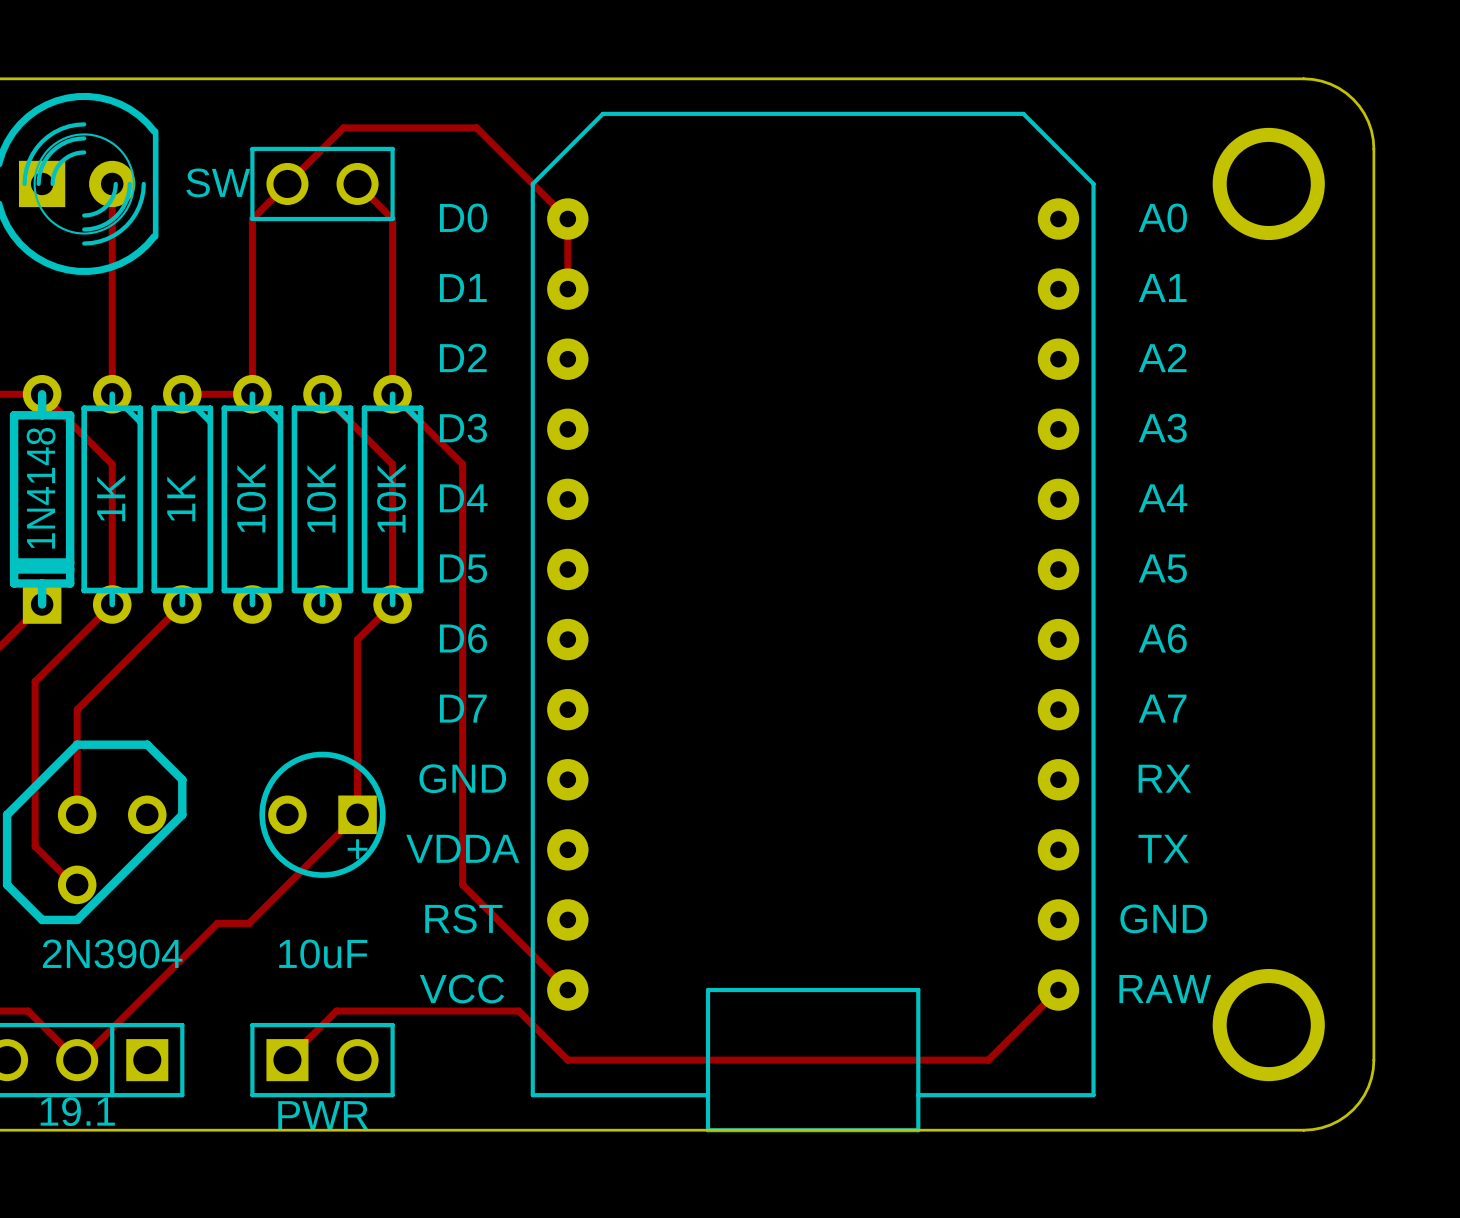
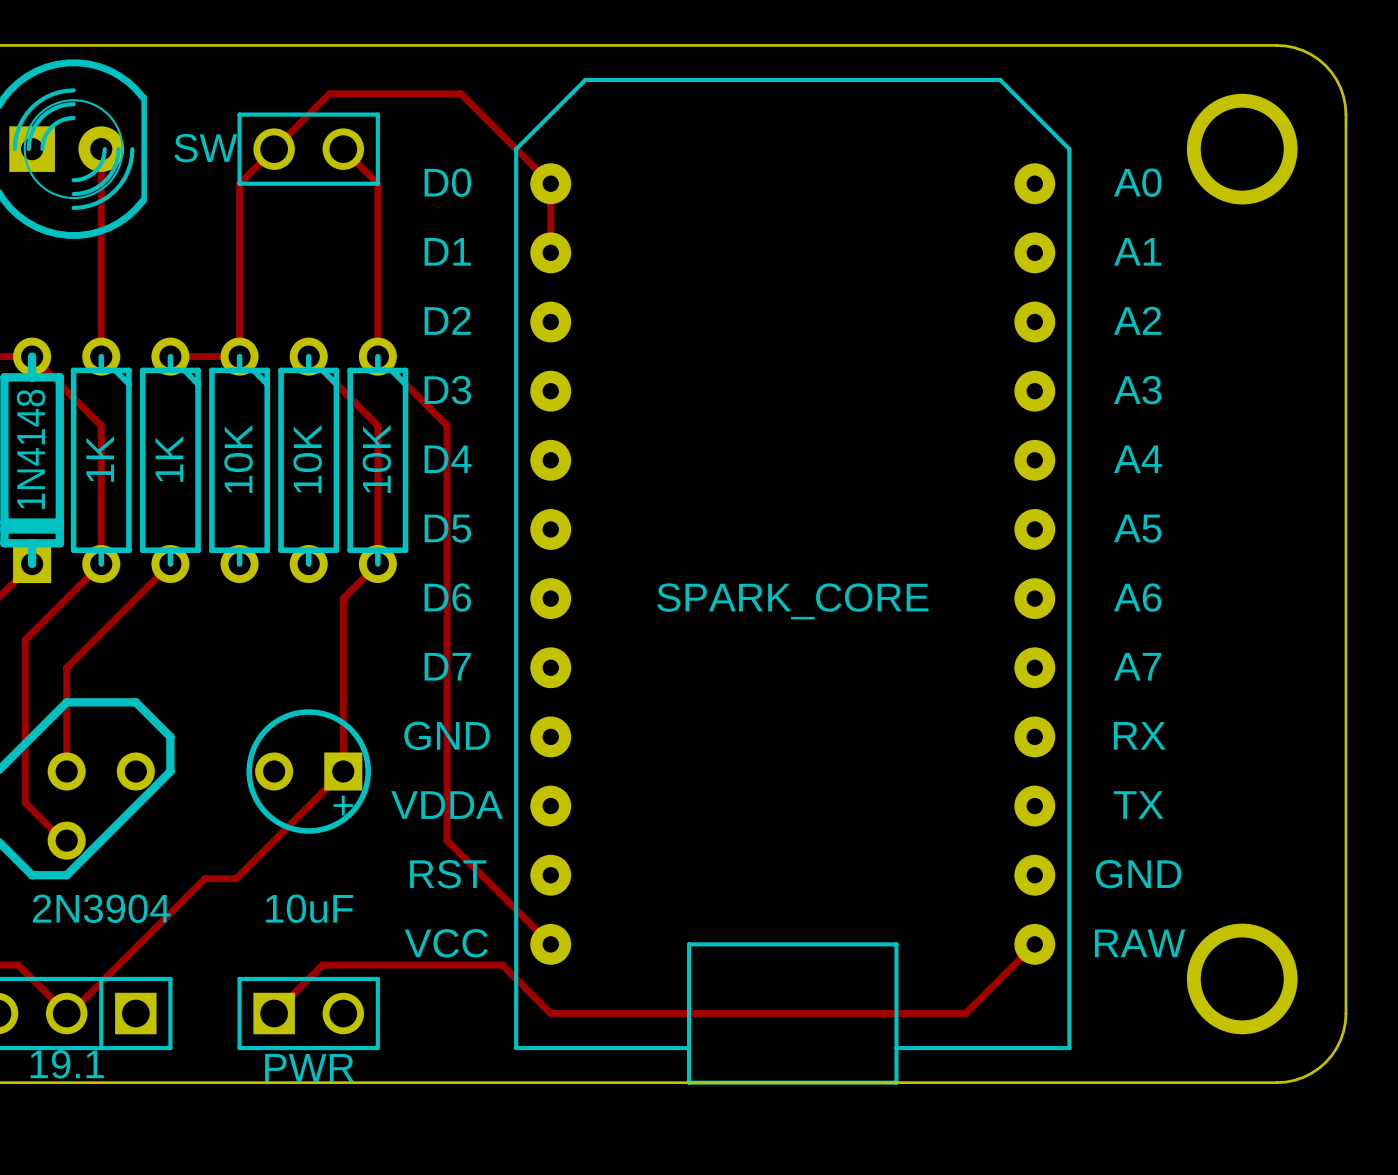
part value: none -> SPARK_CORE (792, 601)

